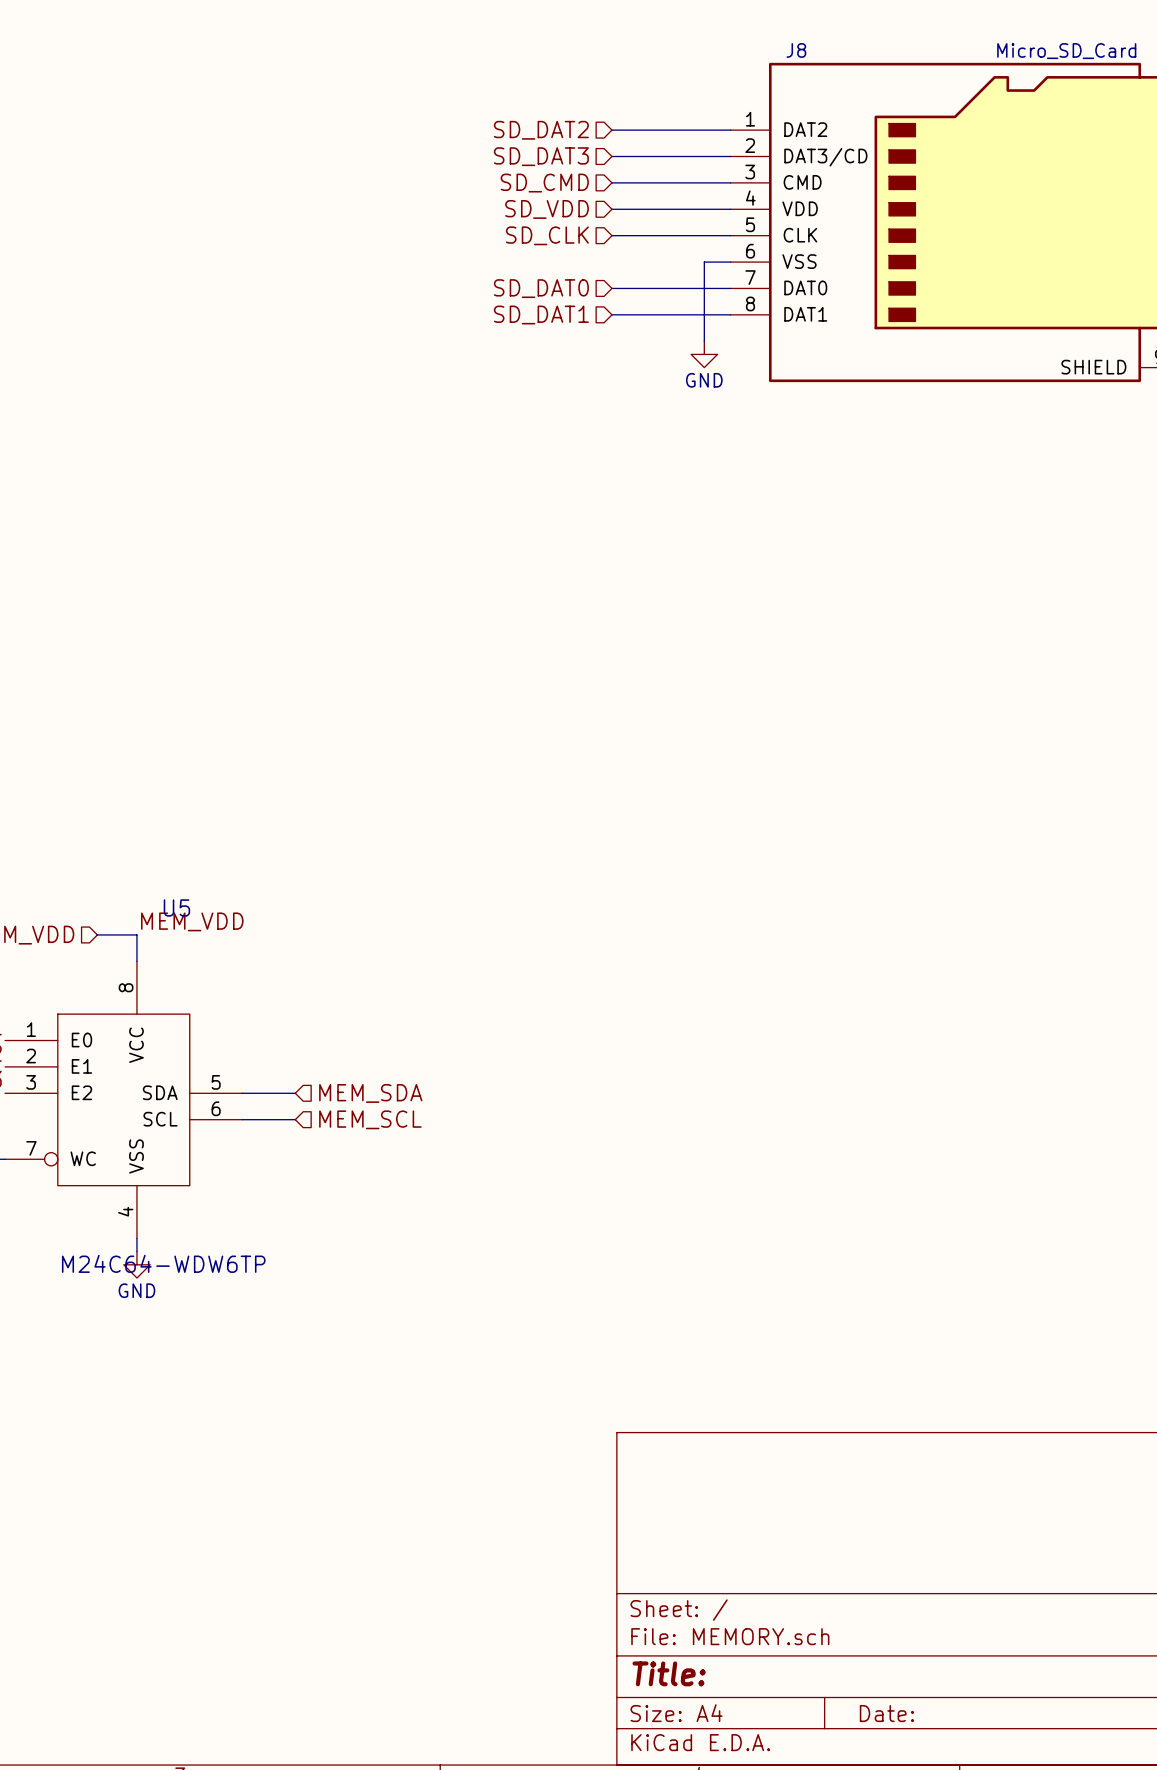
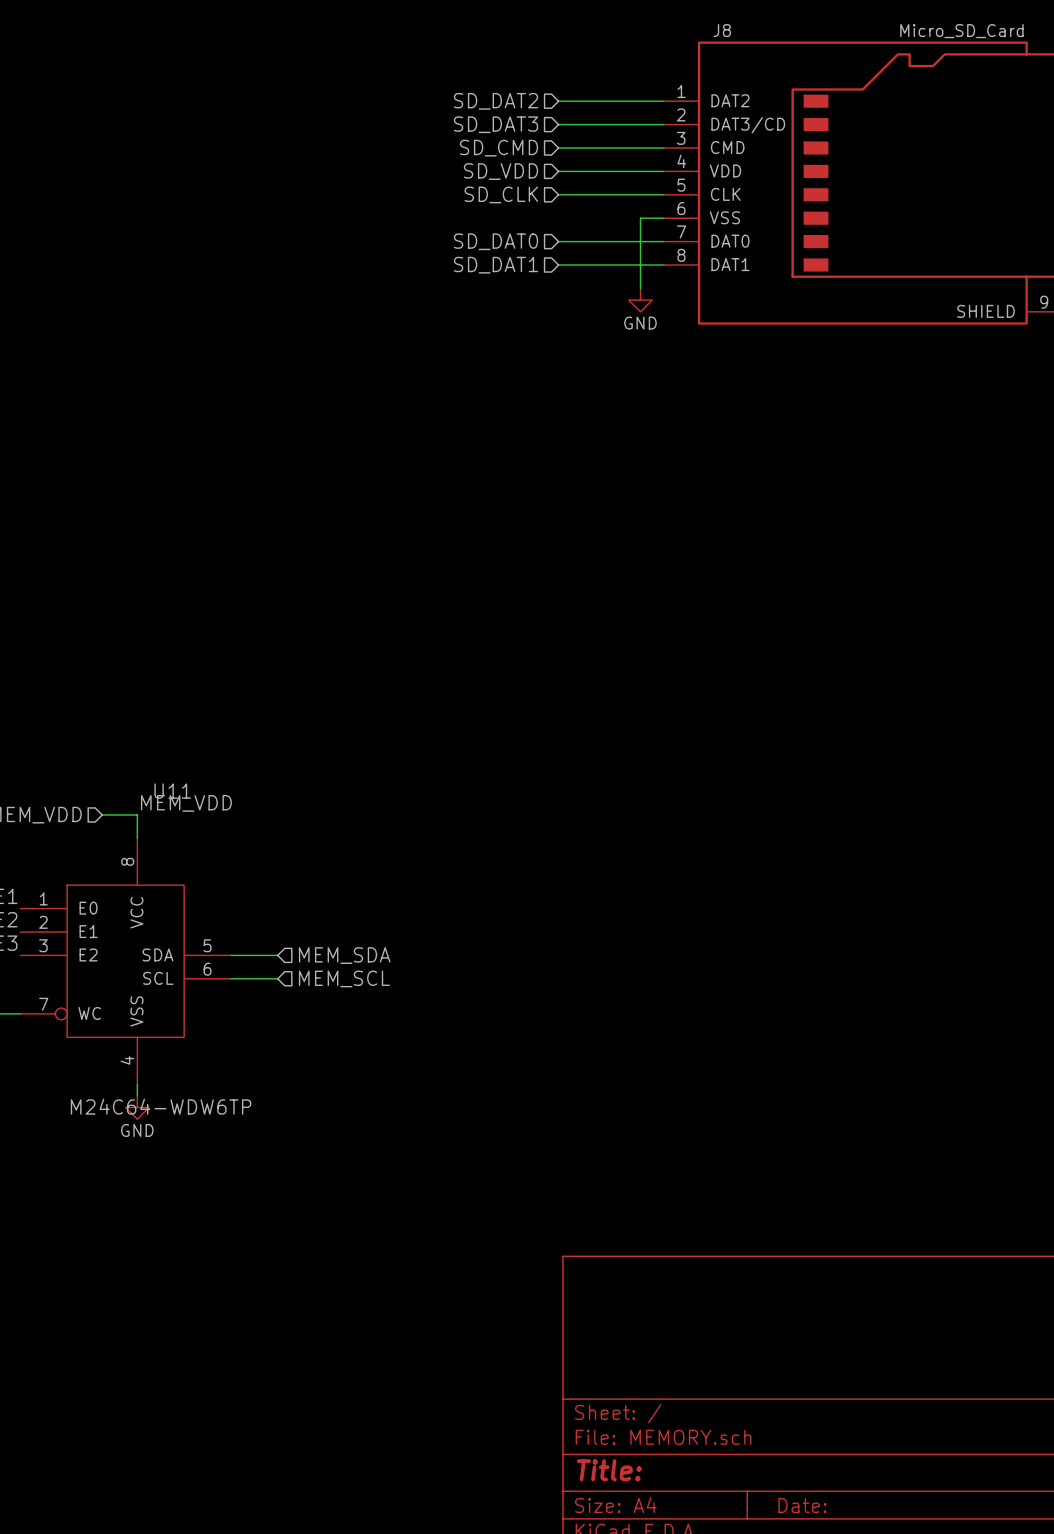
U5 name: U5 (176, 907) -> U11 (172, 791)

